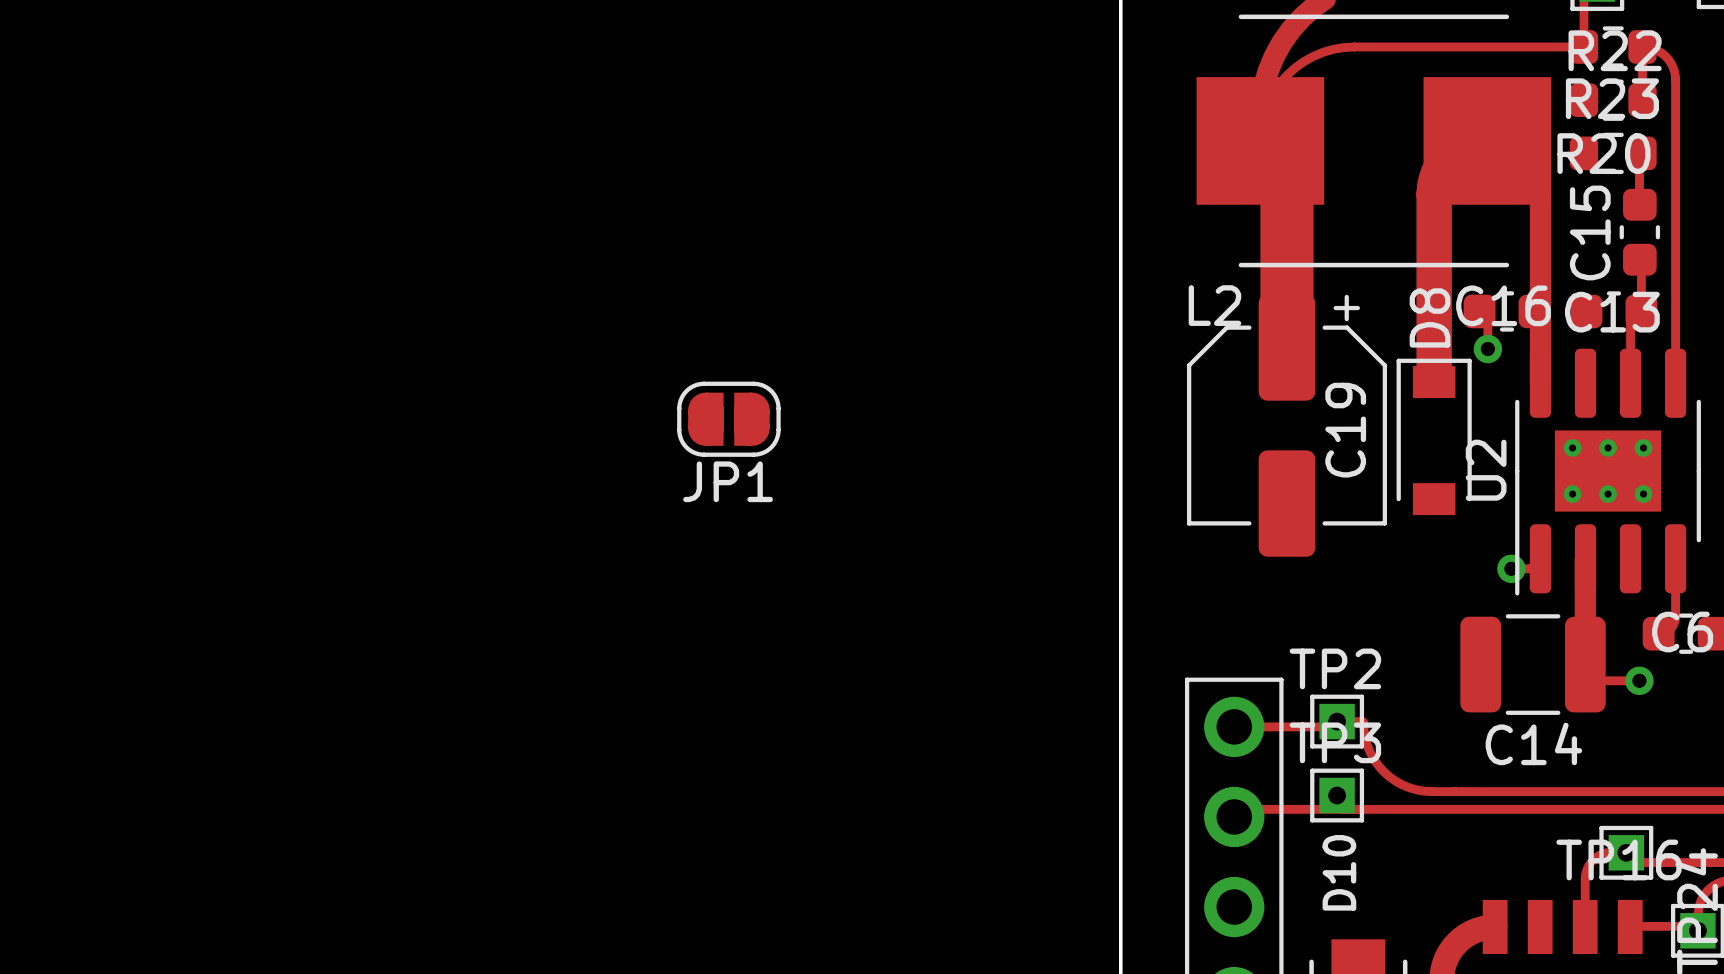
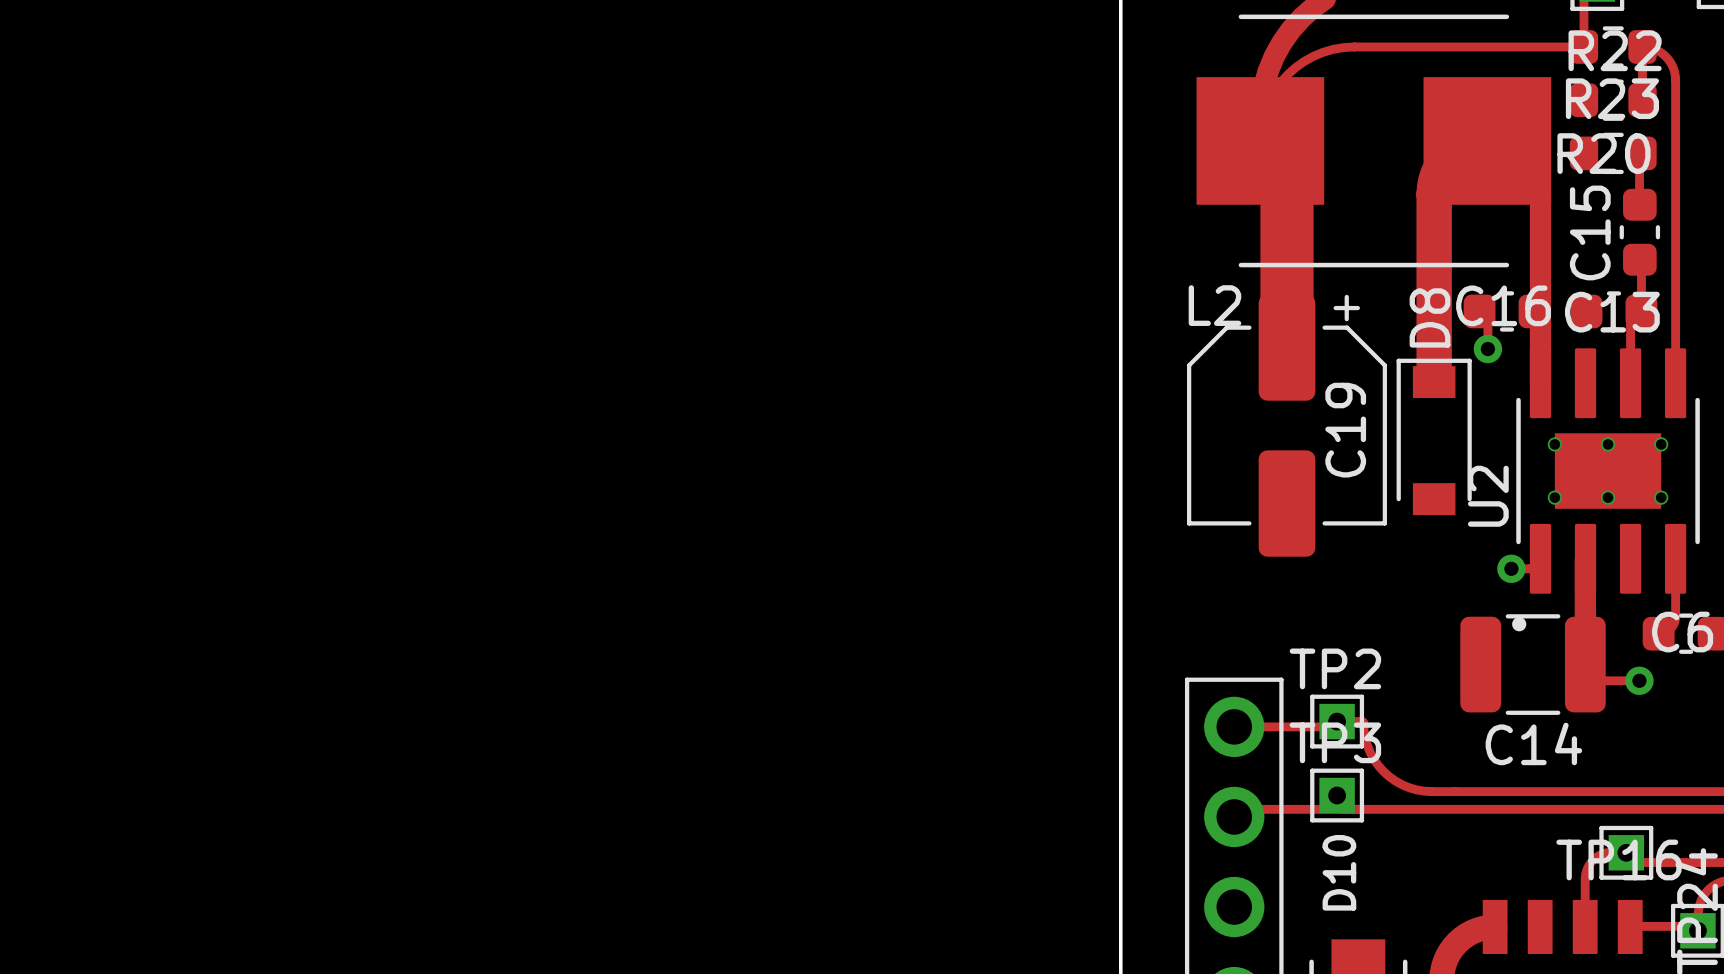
U2 footprint: [1515, 348, 1701, 596] -> [1512, 348, 1700, 632]
JP1: (728, 419) -> none

